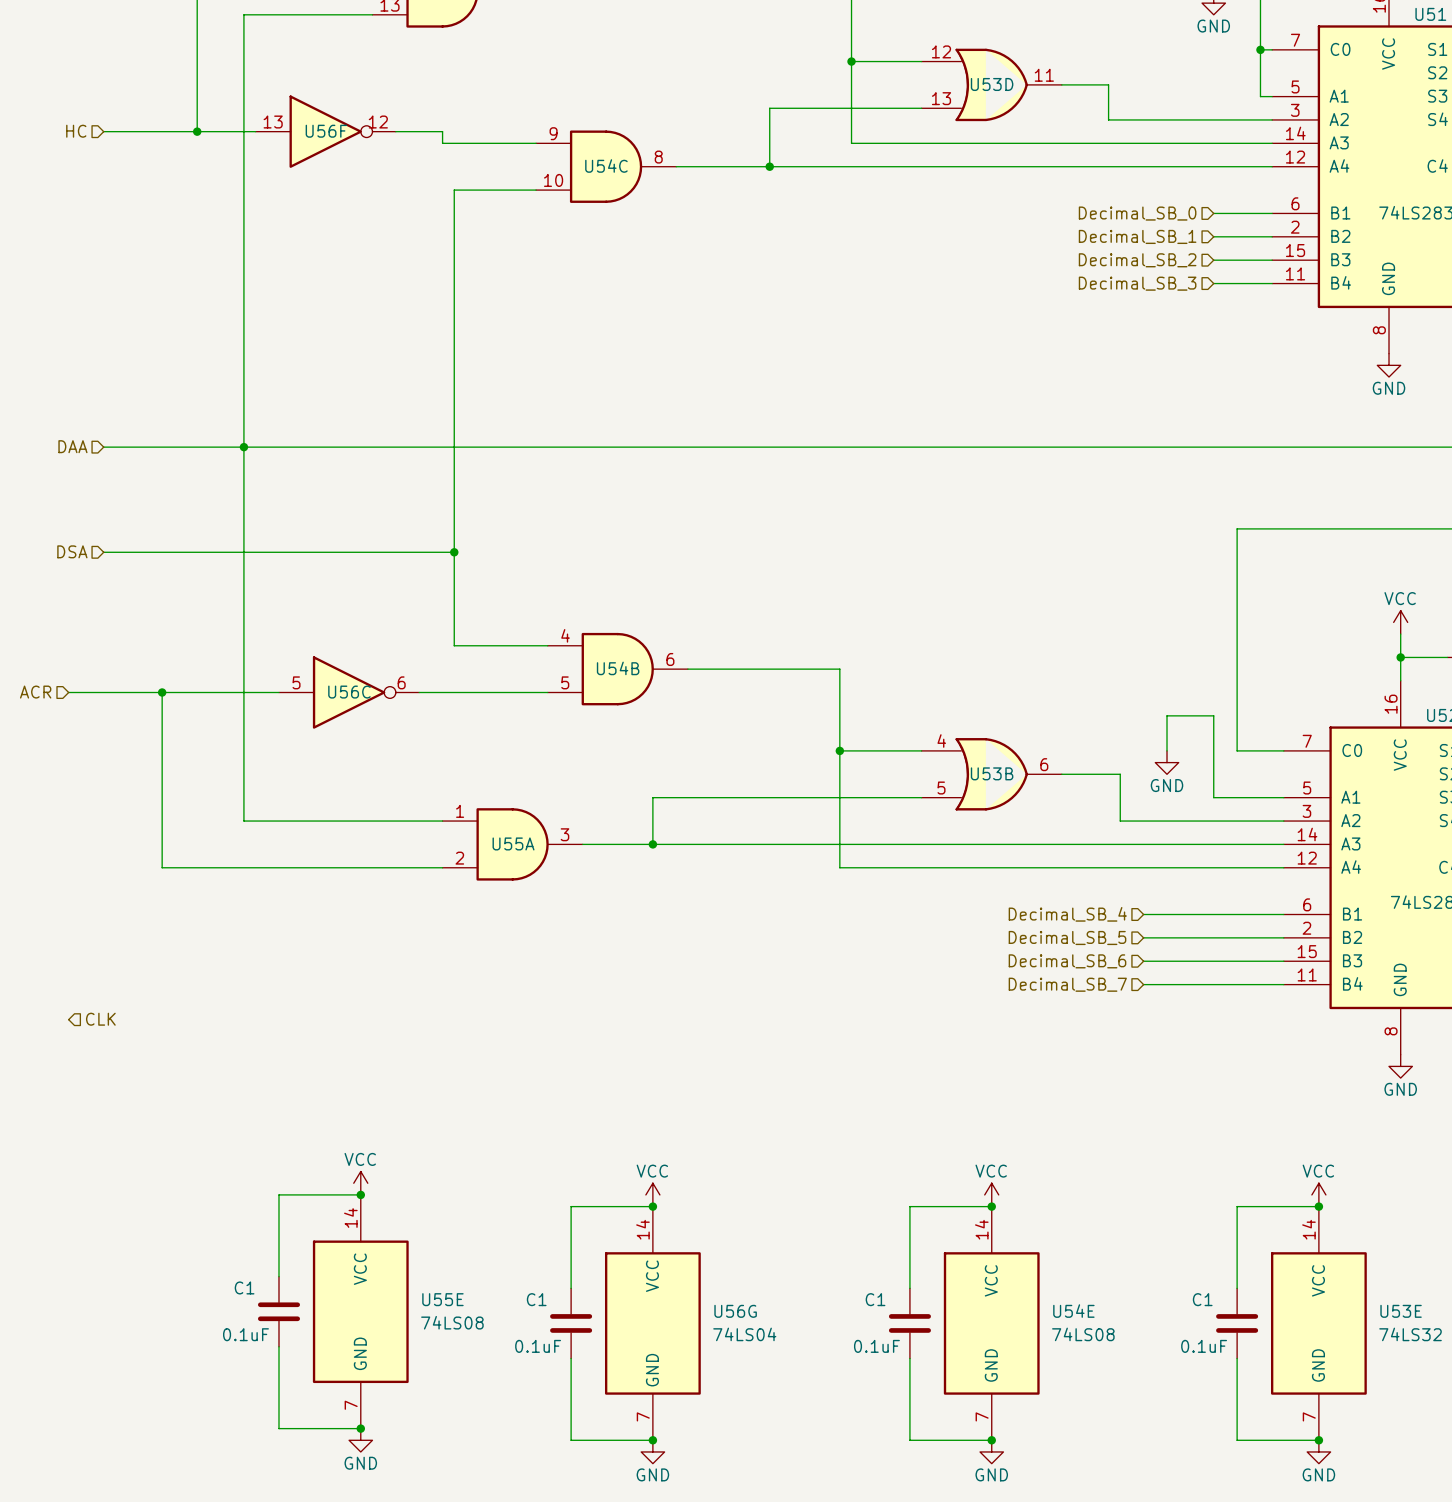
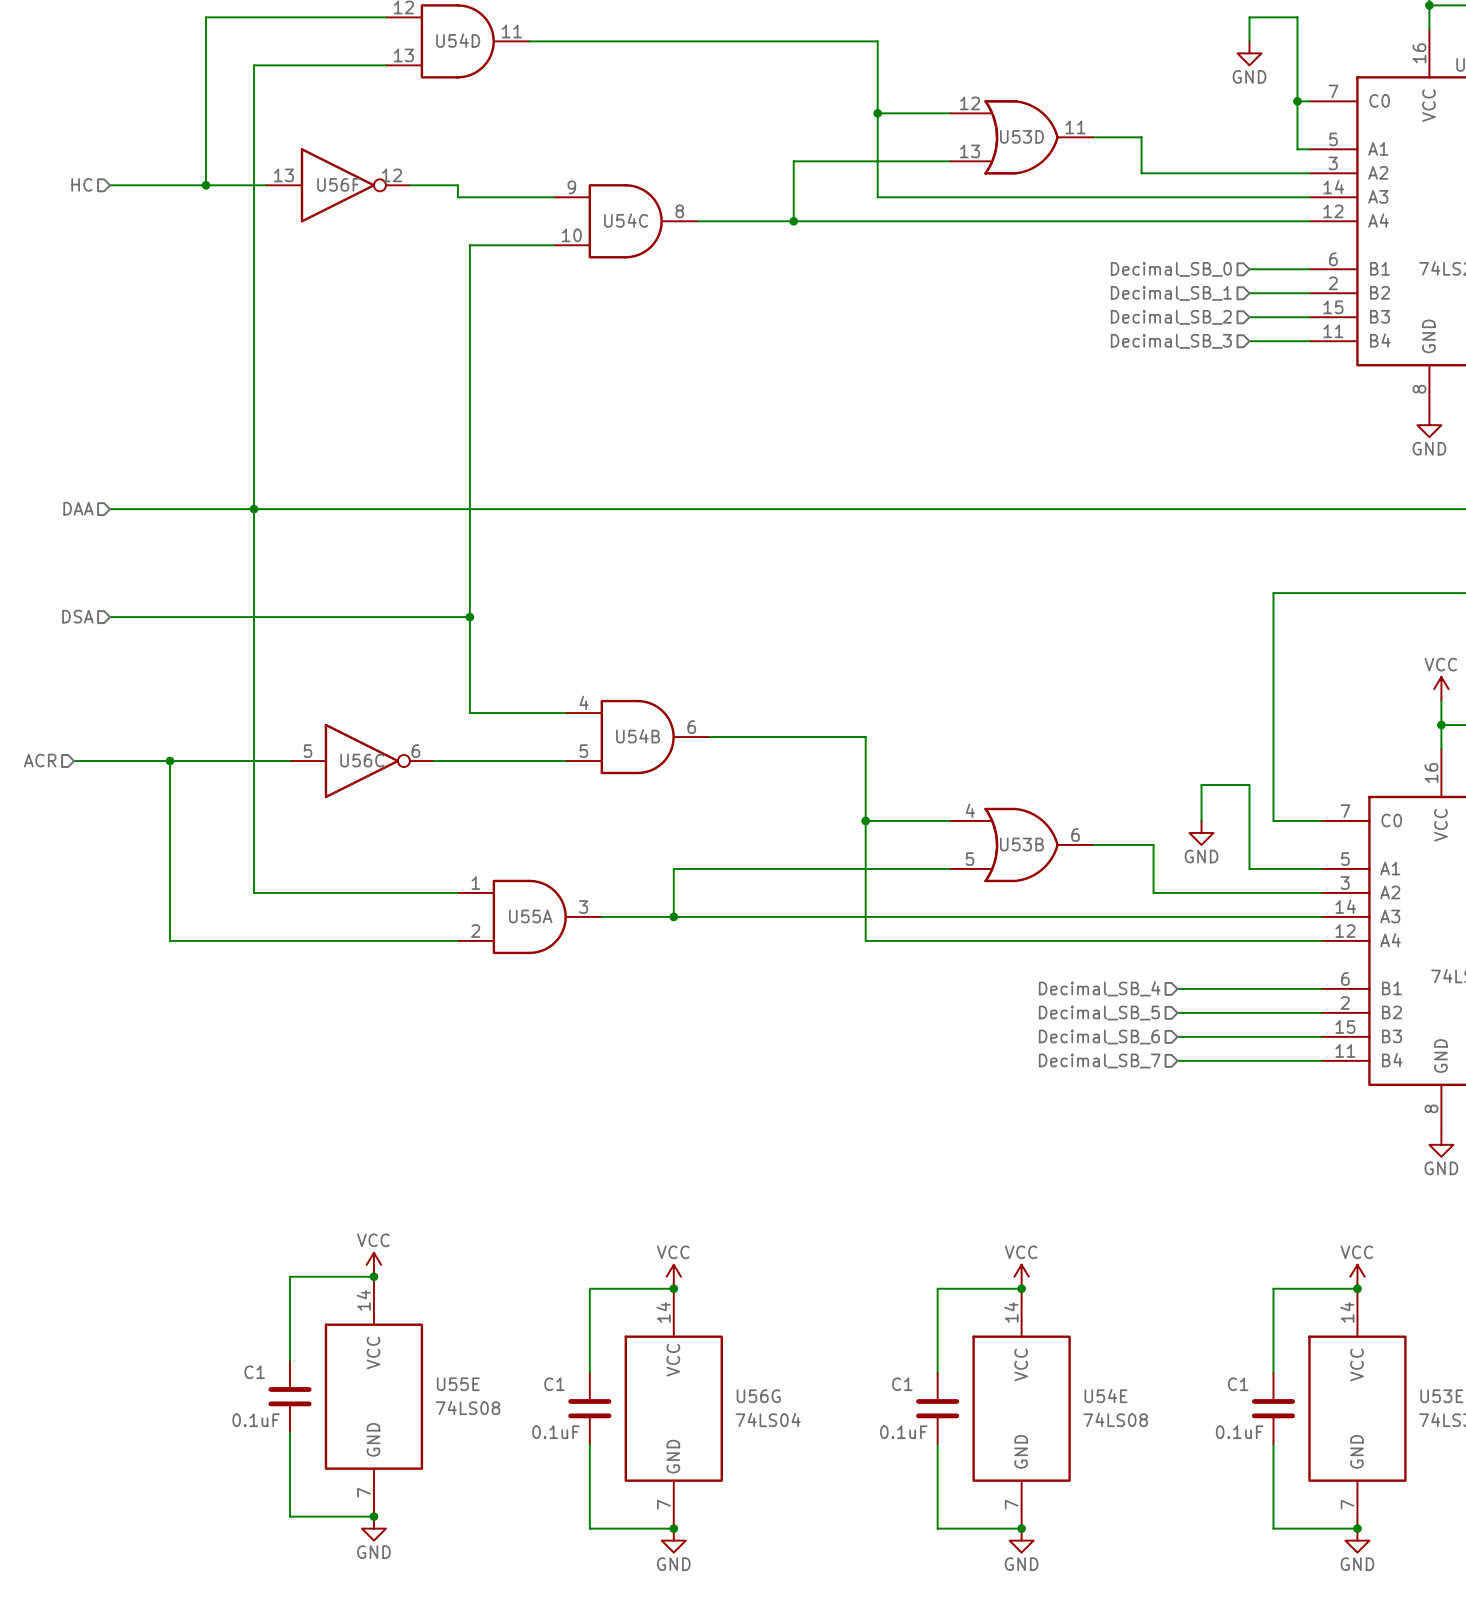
hierarchical label: CLK (100, 1019) -> none

